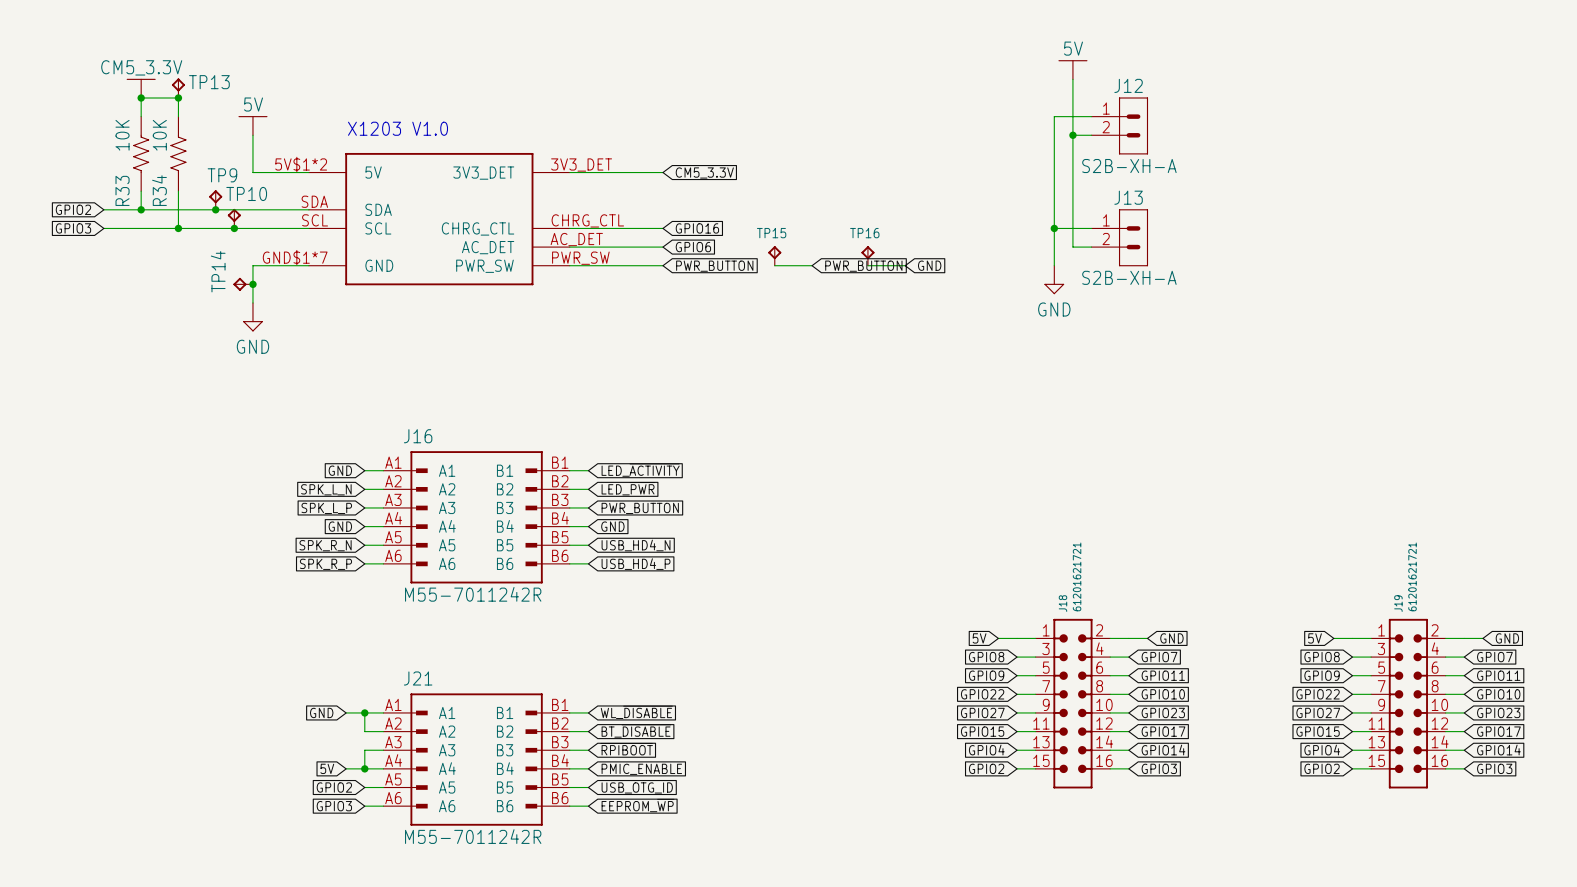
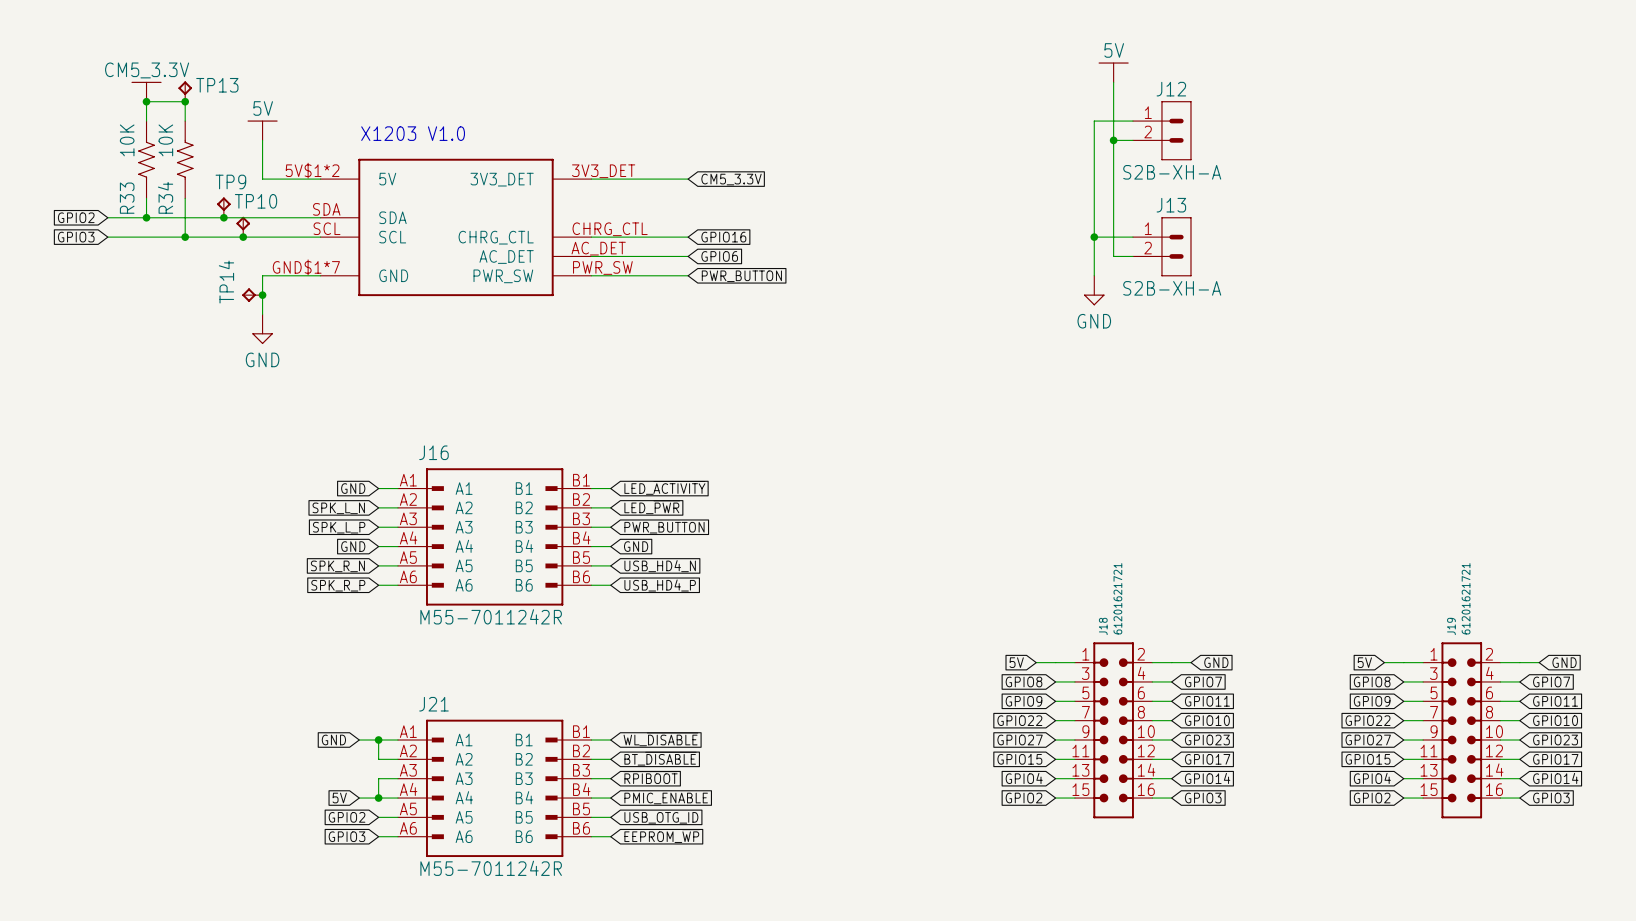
TP15: (774, 255) -> none
TP16: (867, 255) -> none
wire: (774, 265) (812, 265) -> none
wire: (867, 265) (905, 265) -> none
global label: GND (929, 265) -> none
global label: PWR_BUTTON (863, 266) -> none

